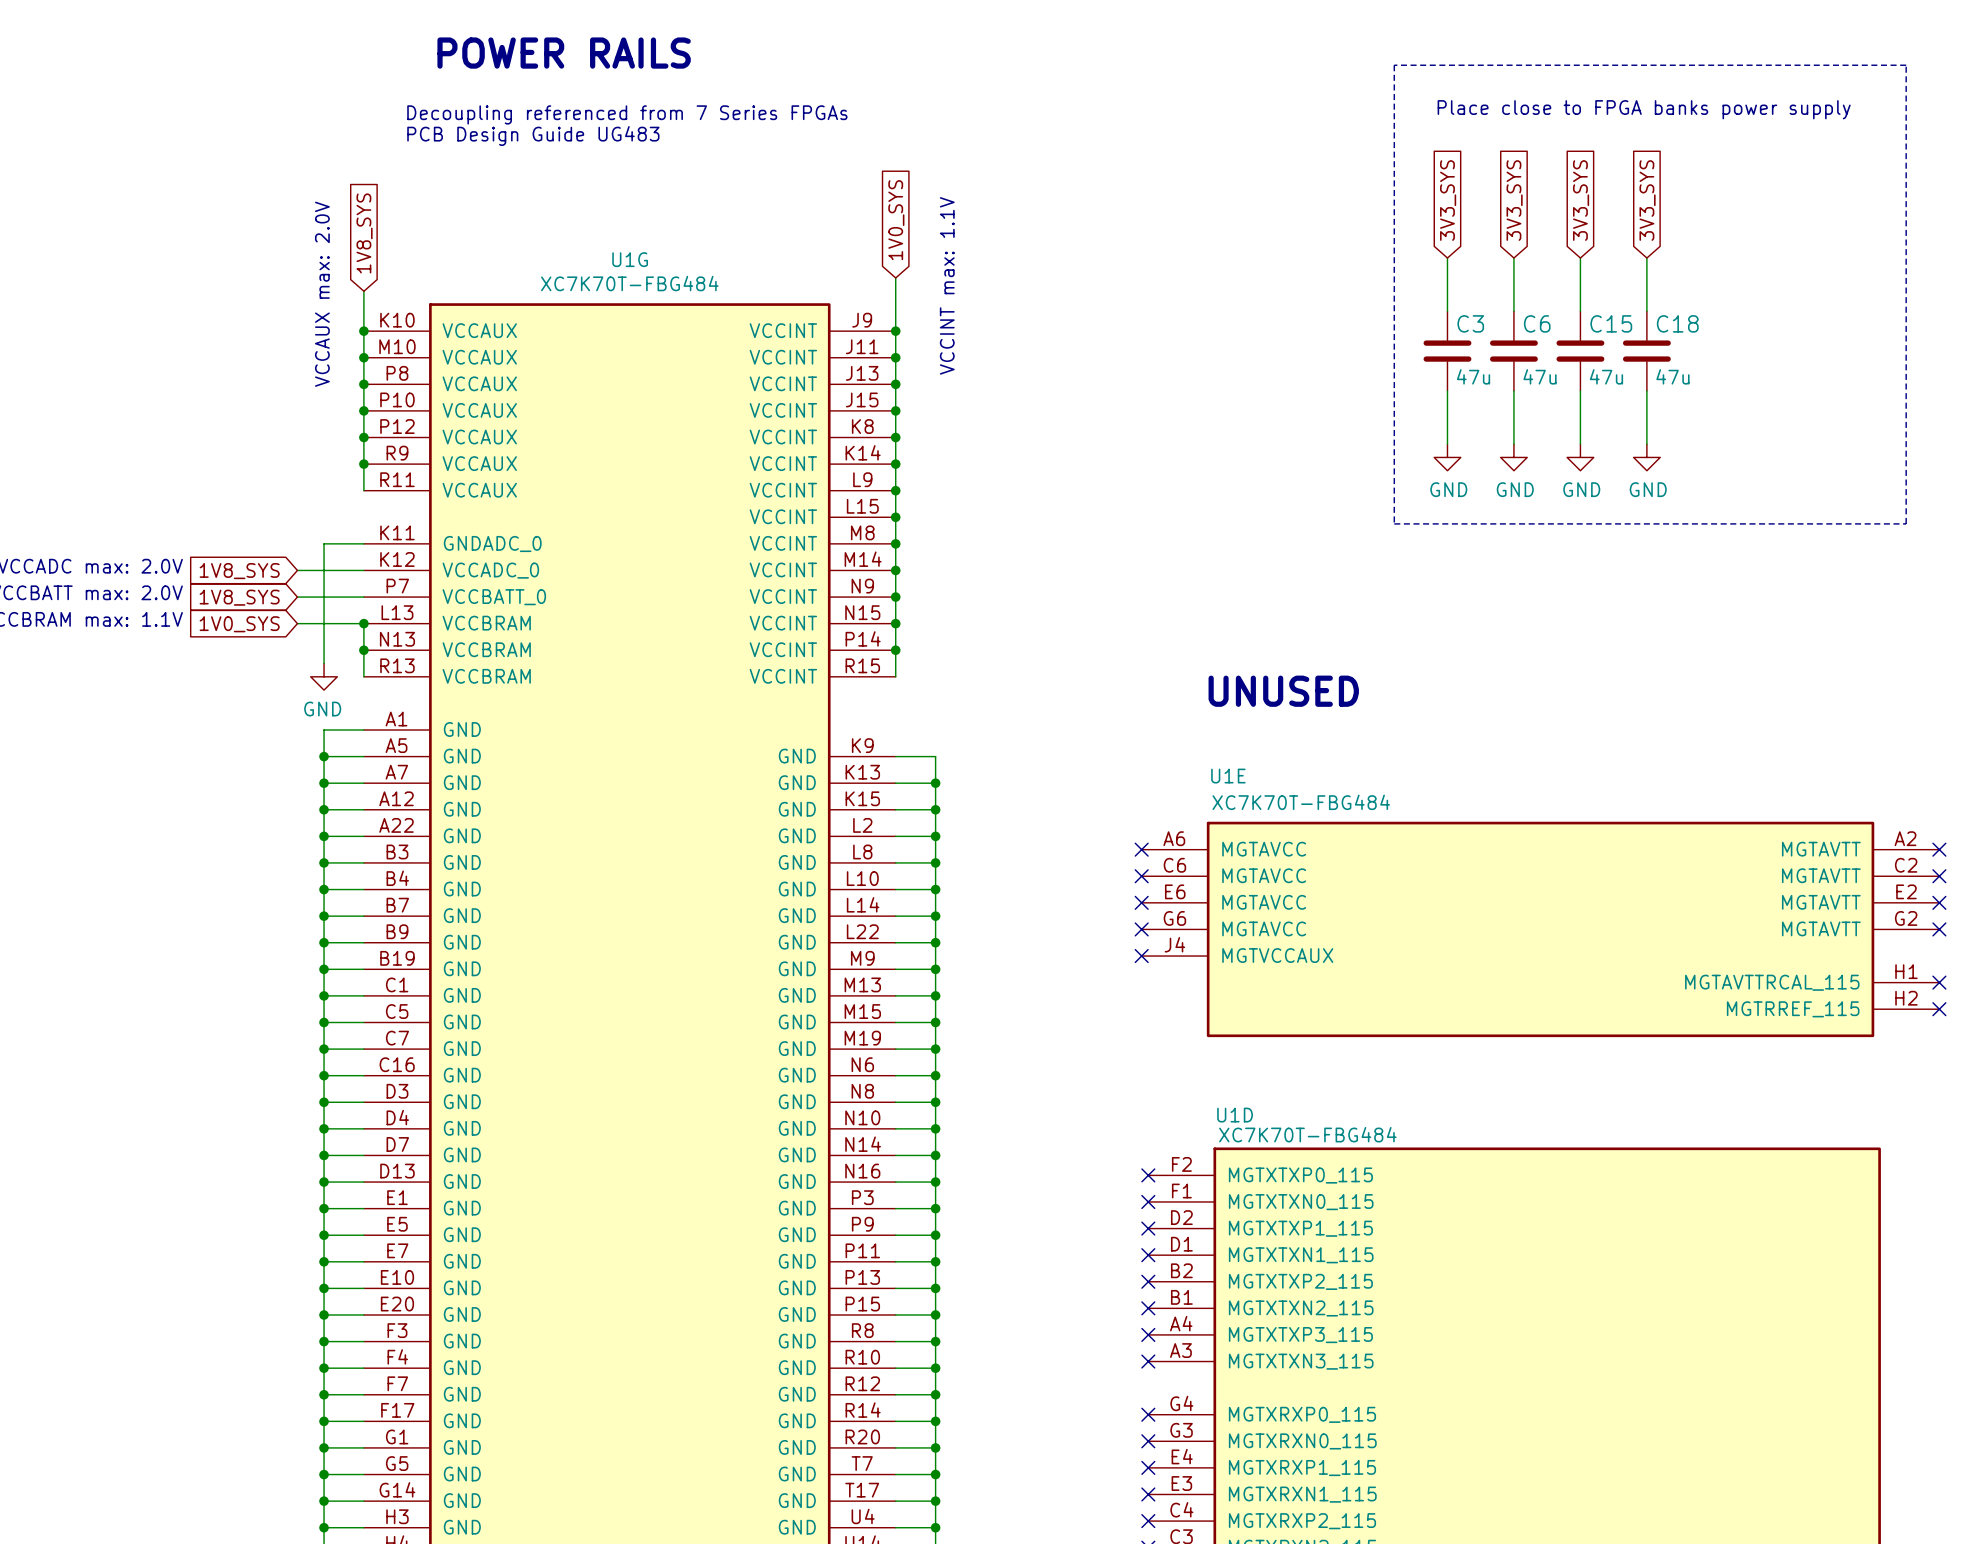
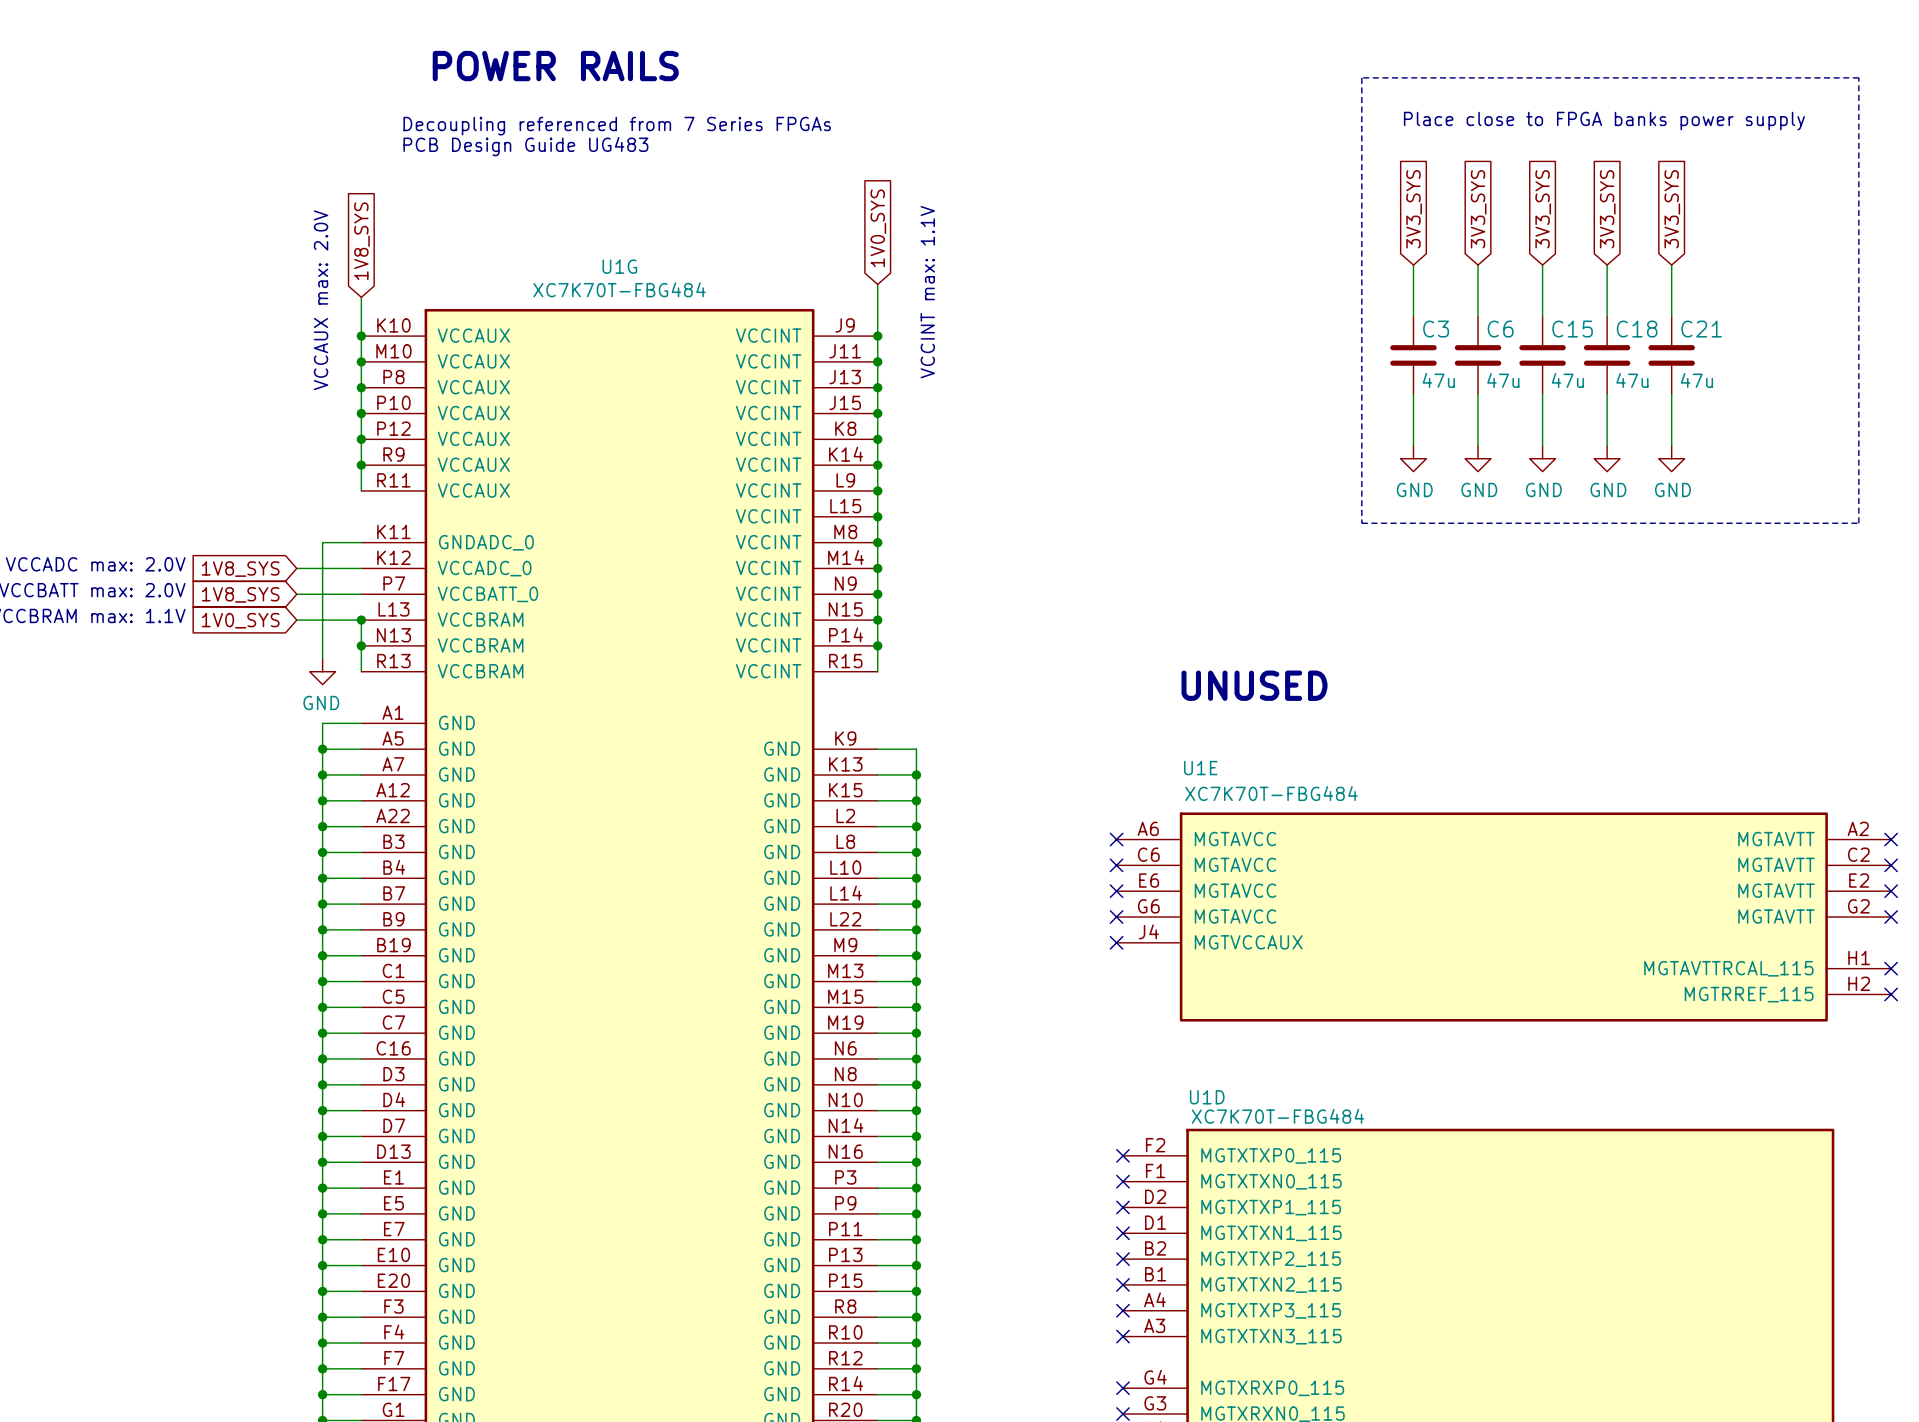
global label: none -> 3V3_SYS (1672, 209)
wire: none -> (1671, 265) (1671, 316)
C21: none -> (1671, 355)
wire: none -> (1671, 394) (1671, 445)
power symbol: none -> GND (1671, 458)

